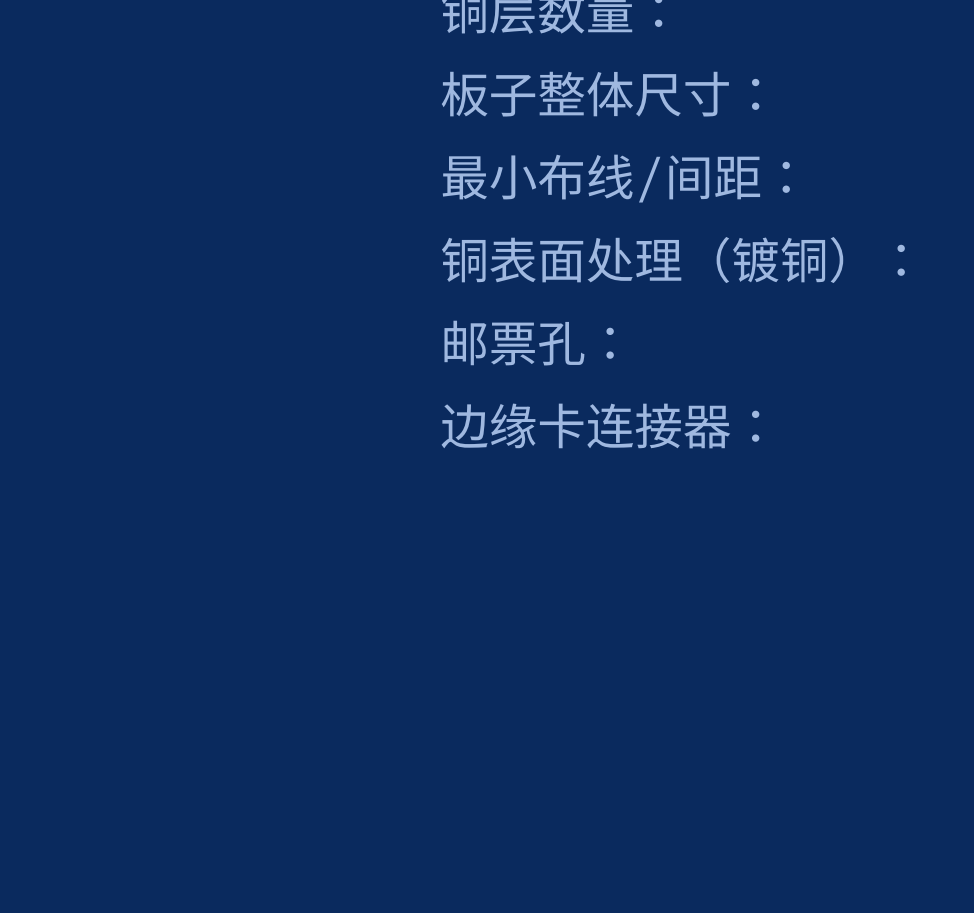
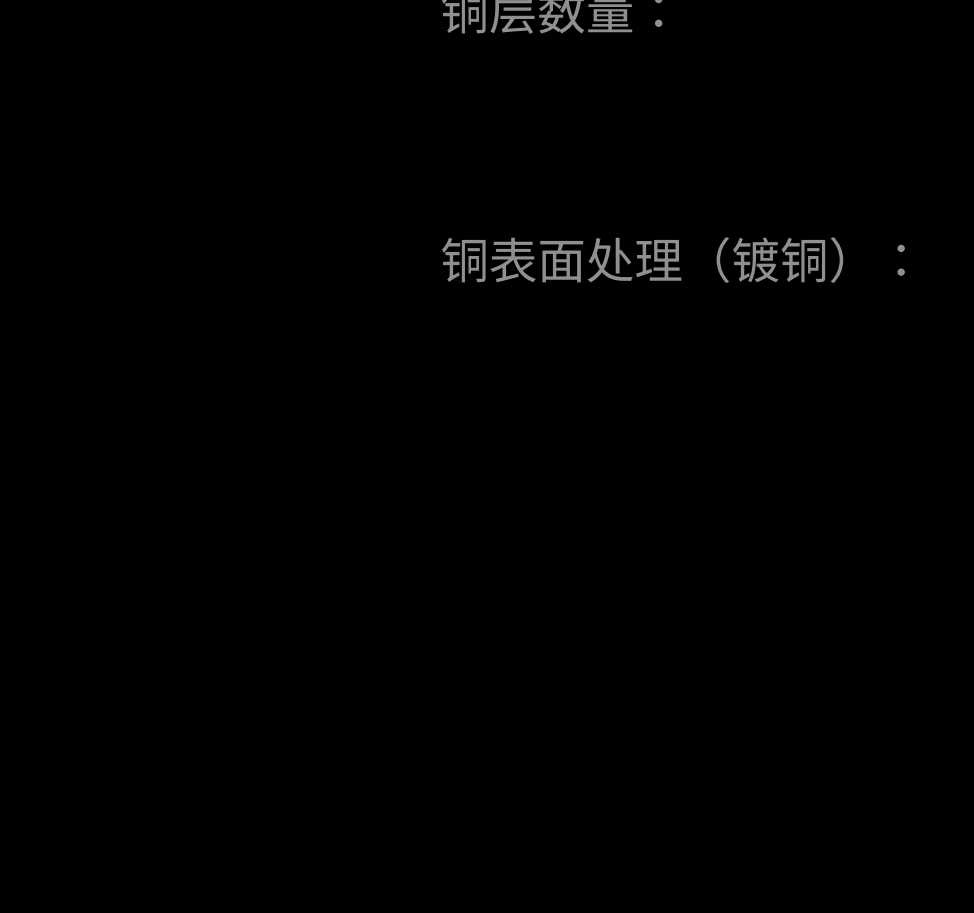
text: 板子整体尺寸： (600, 94) -> none
text: 最小布线/间距： (616, 178) -> none
text: 邮票孔： (529, 343) -> none
text: 边缘卡连接器： (600, 425) -> none

